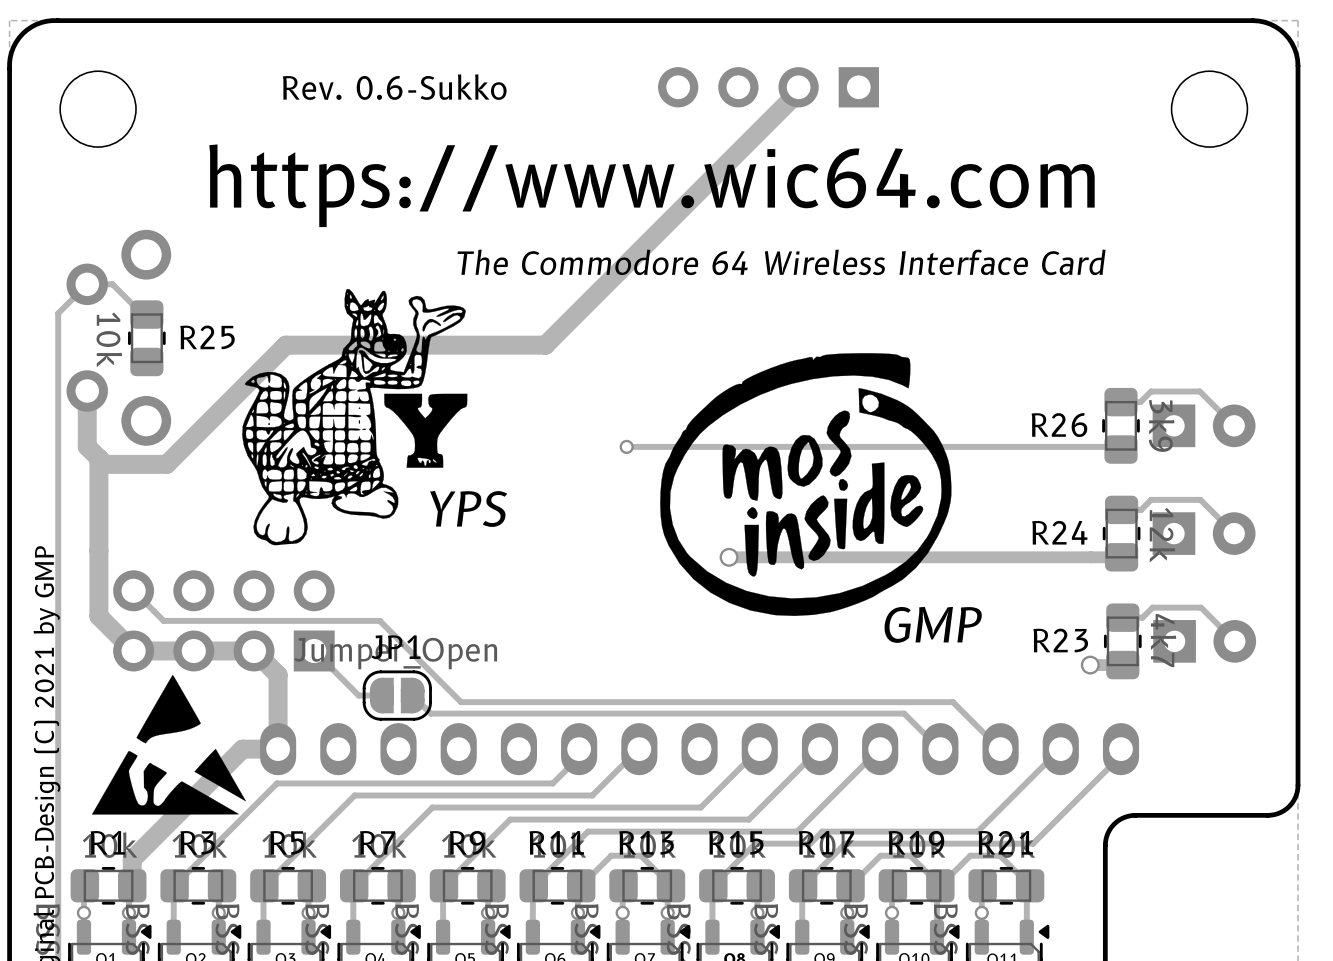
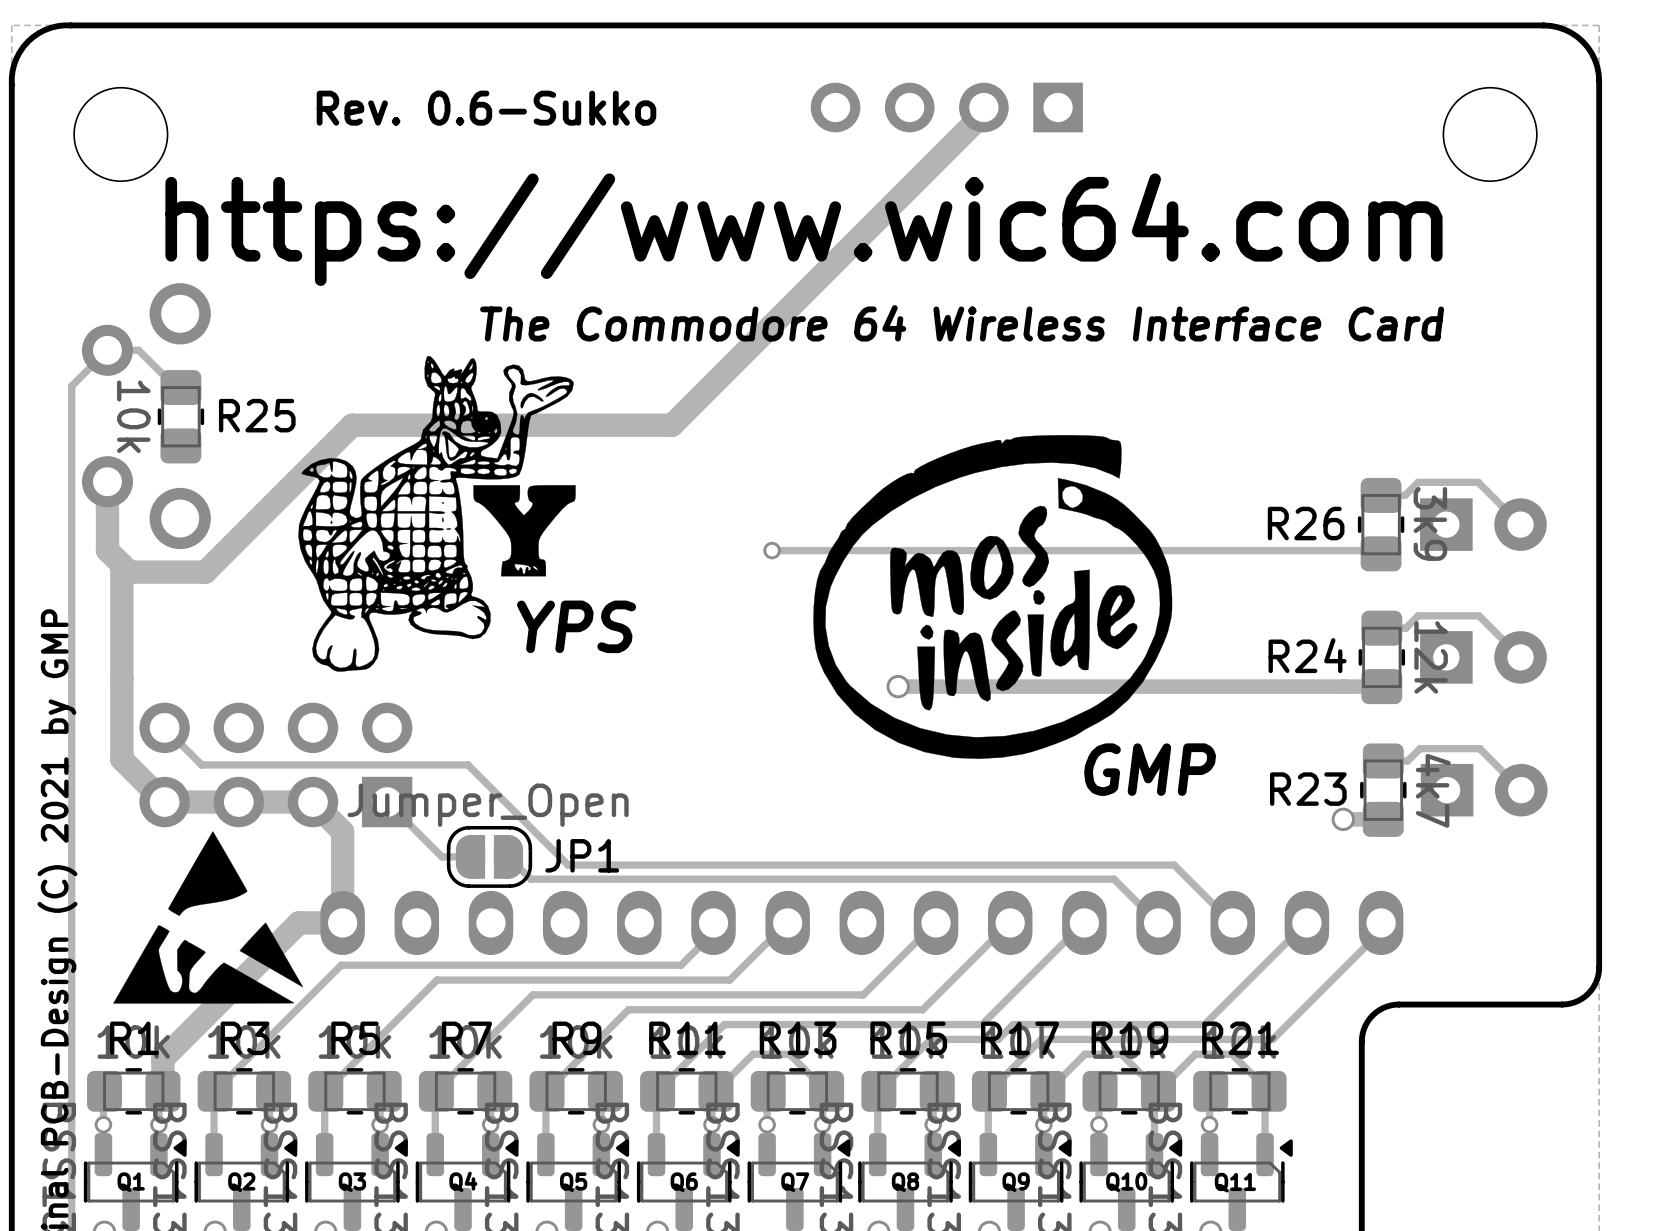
JP1 name position: JP1 (395, 647) -> JP1 (582, 855)

